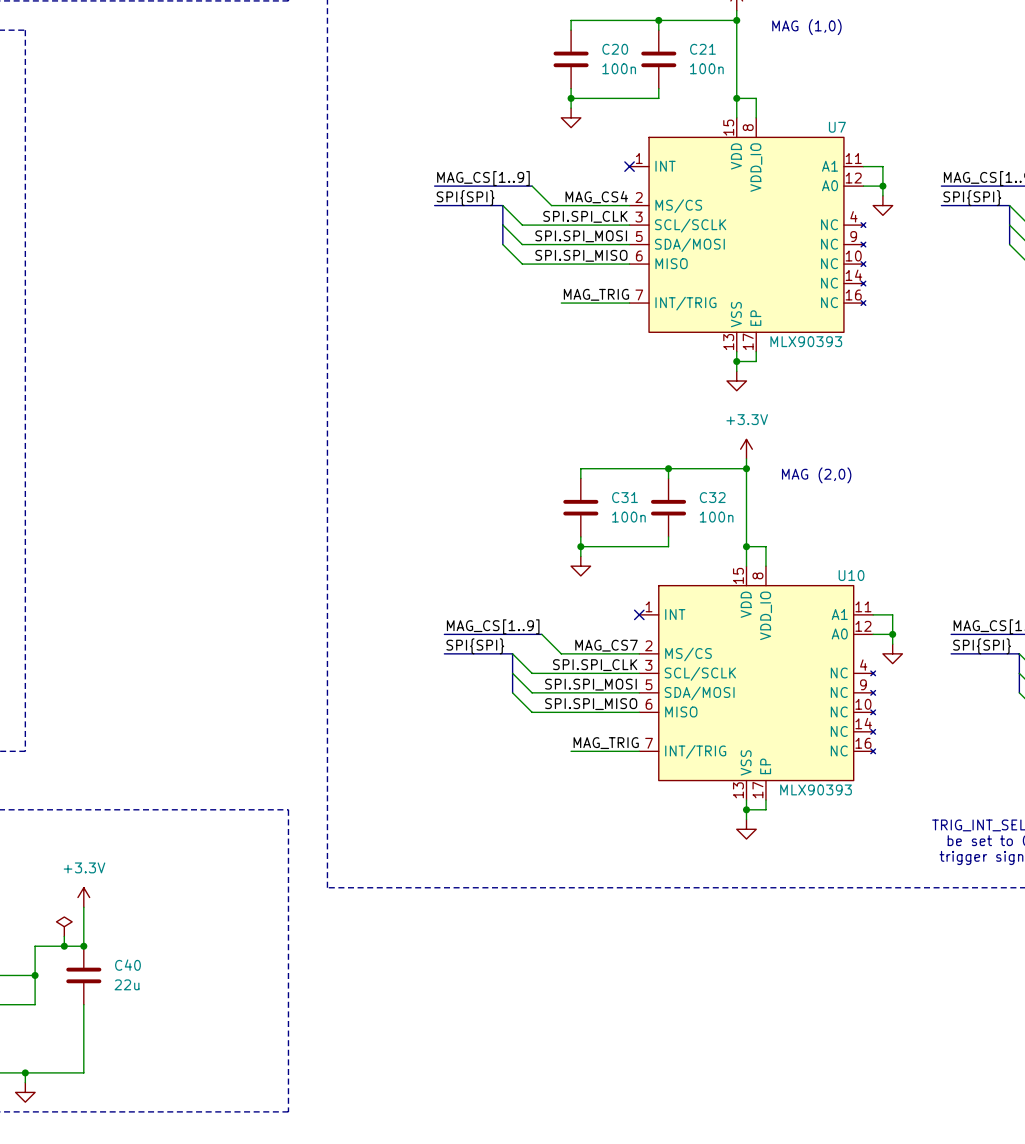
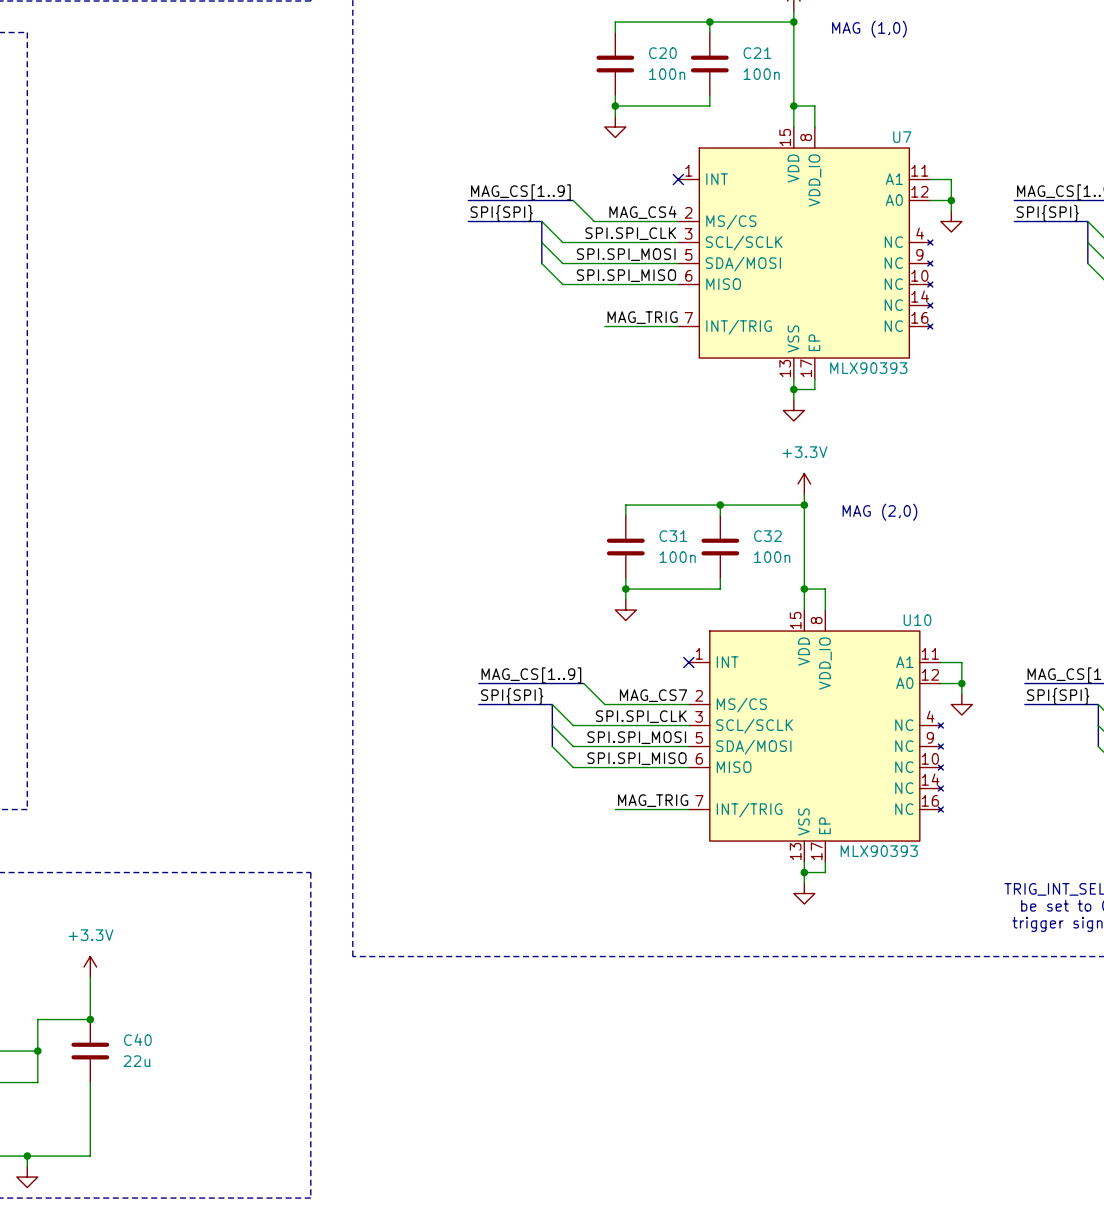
power symbol: (64, 926) -> none
wire: (64, 936) (64, 946) -> none
junction: (64, 946) -> none

